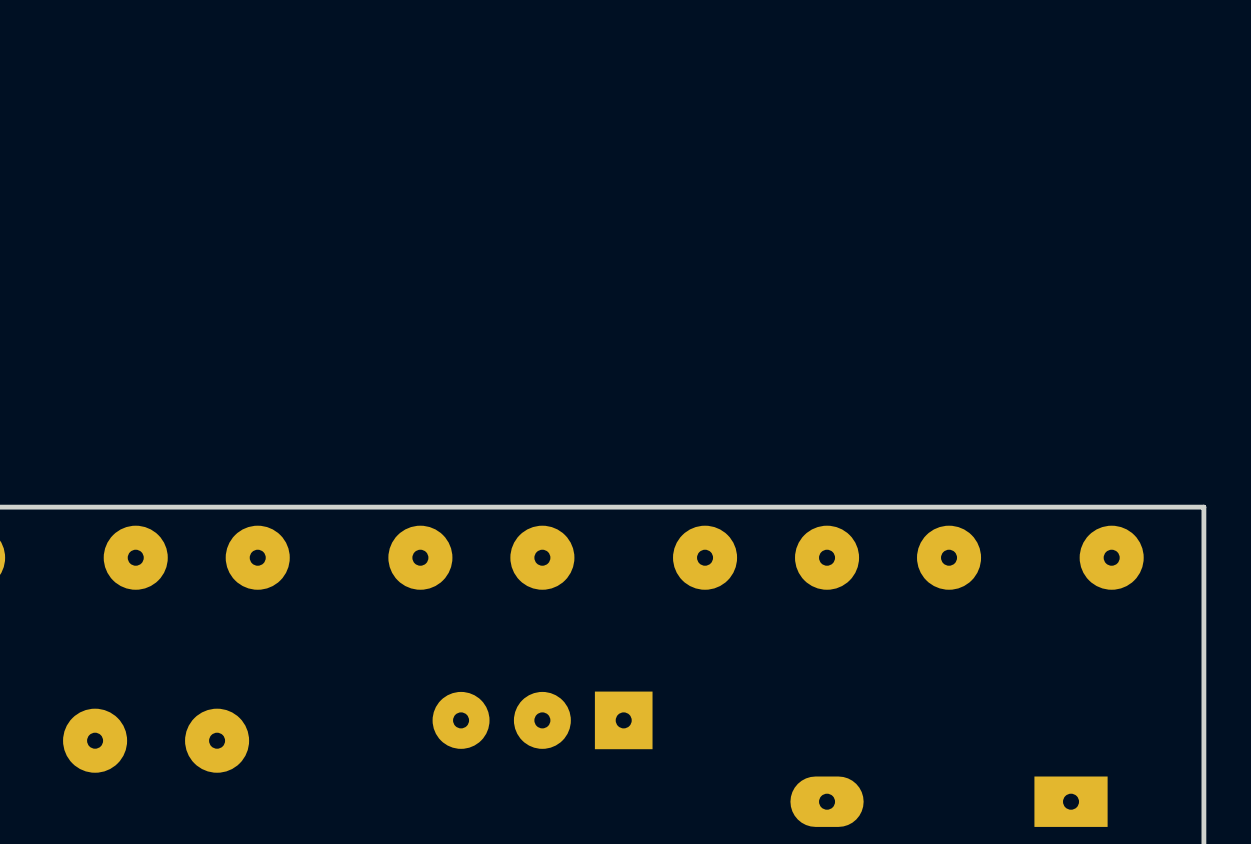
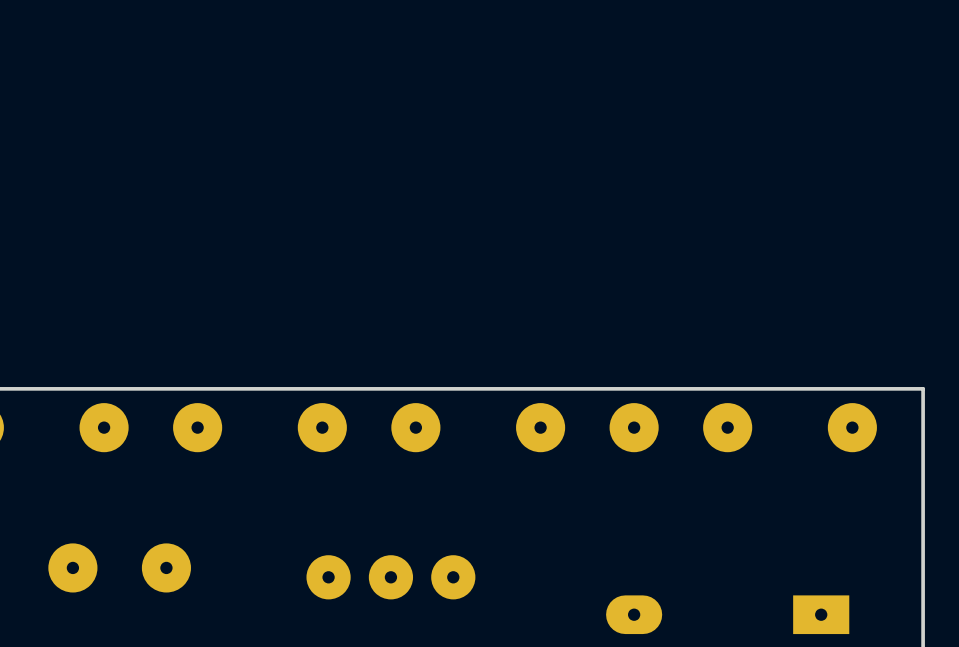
part: (542, 720) -> none
part: none -> (390, 577)

